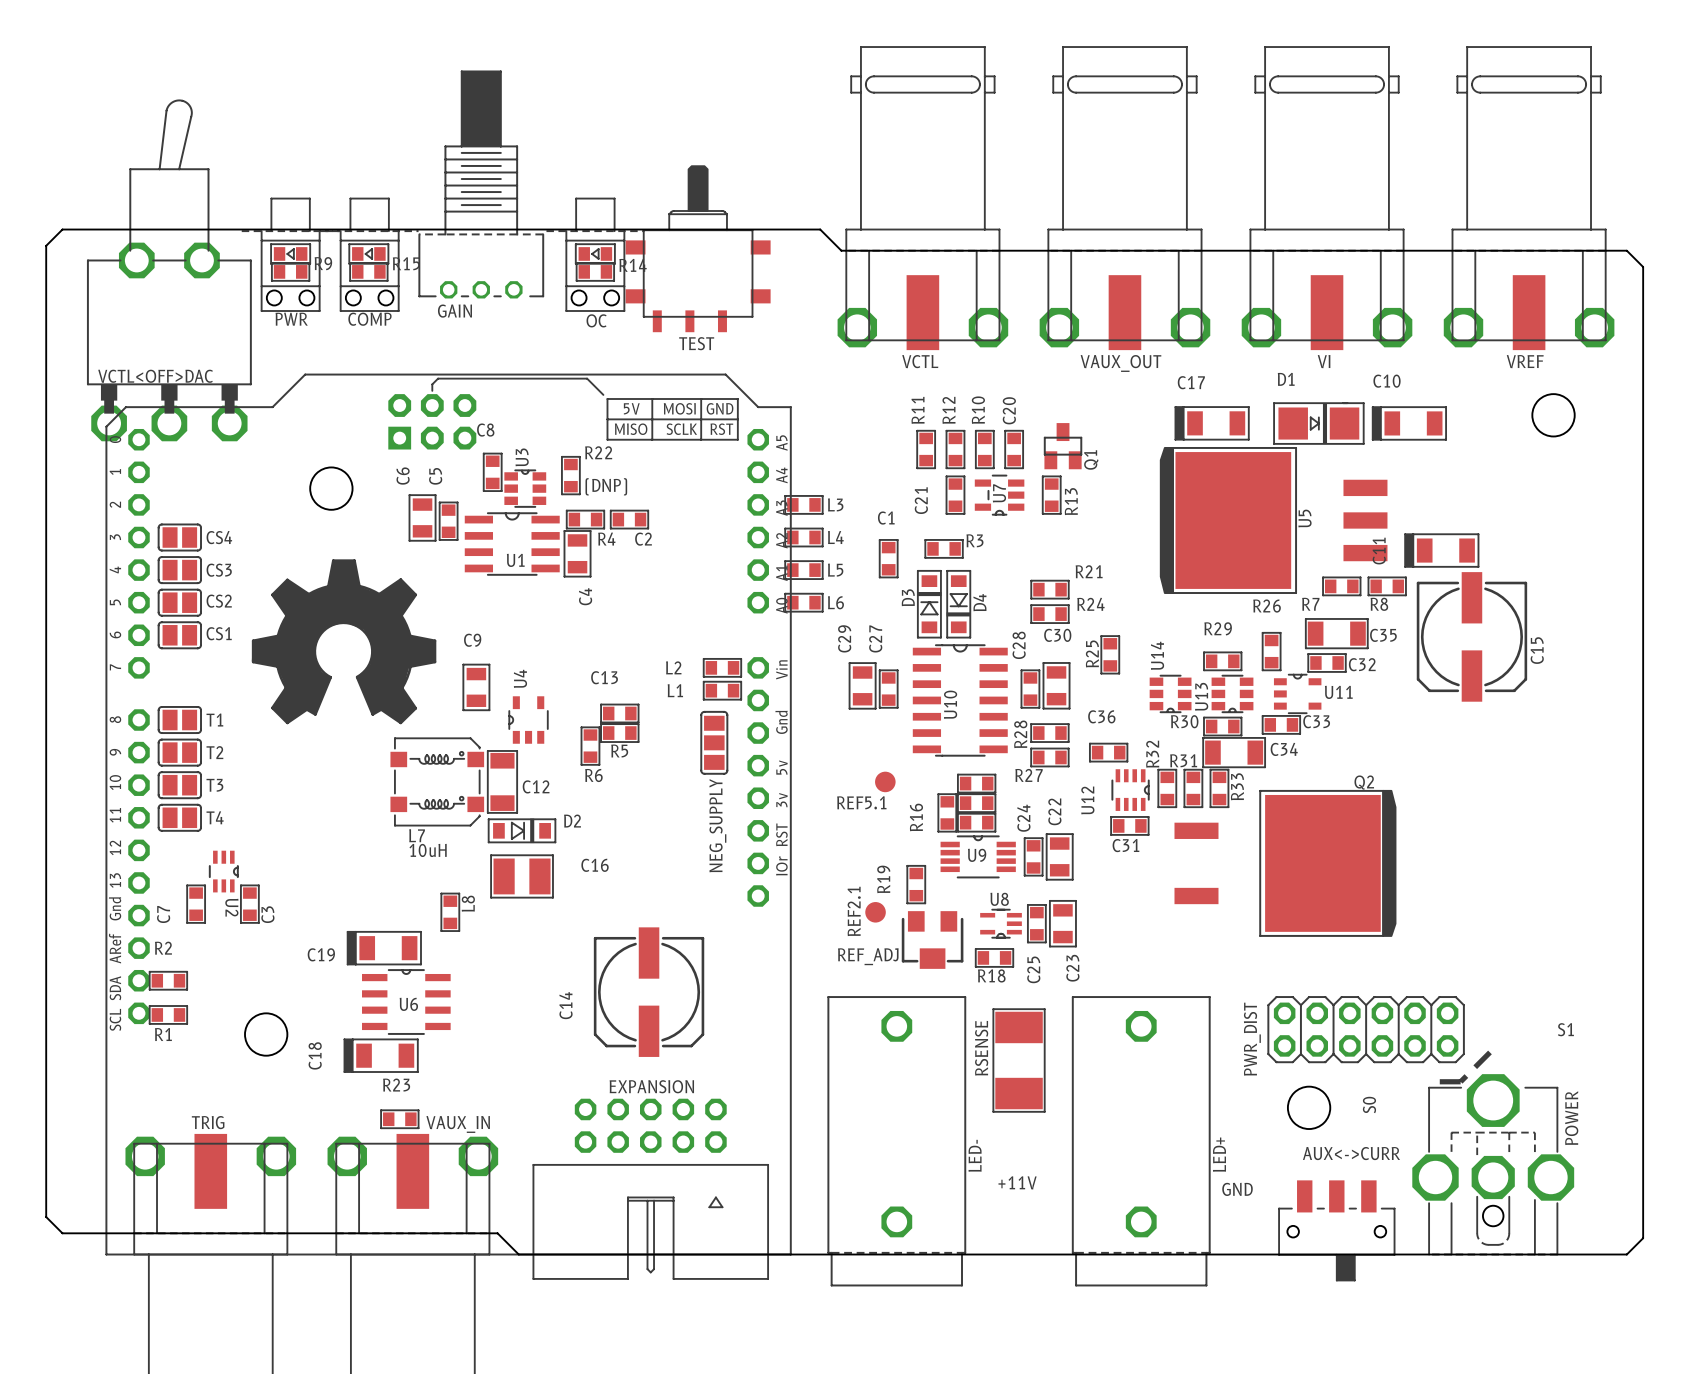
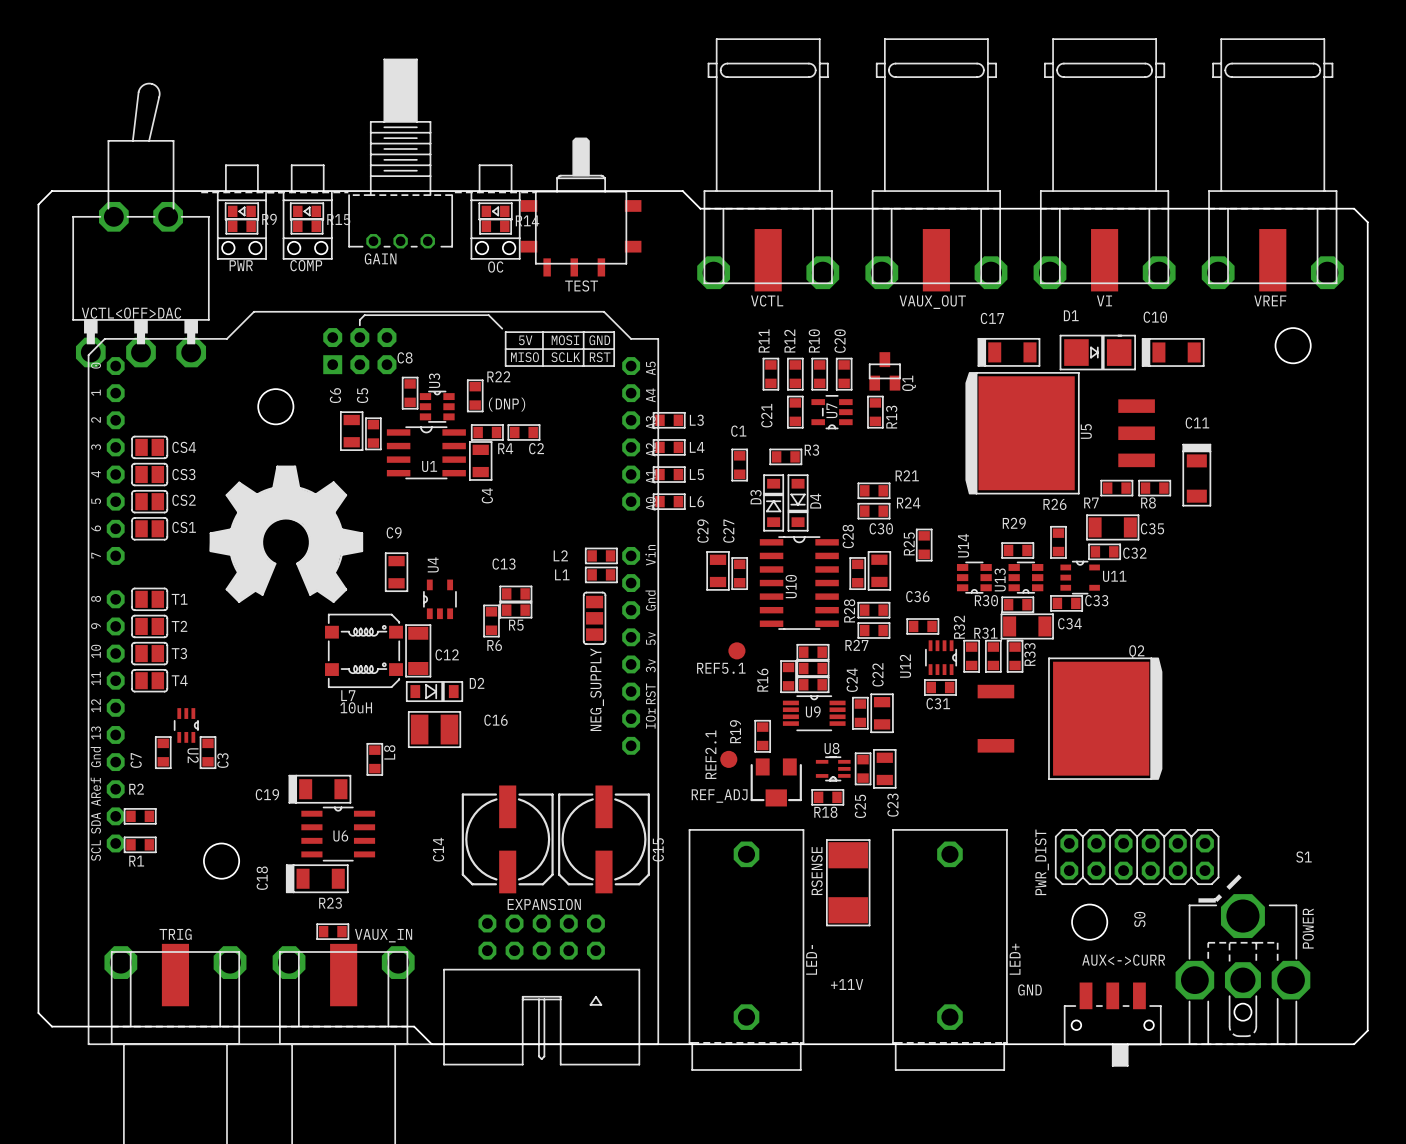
C11 rotation: 0° (1441, 550) -> 90° clockwise (1196, 475)
C15 position: (1471, 636) -> (604, 839)
C14 position: (649, 992) -> (507, 839)

